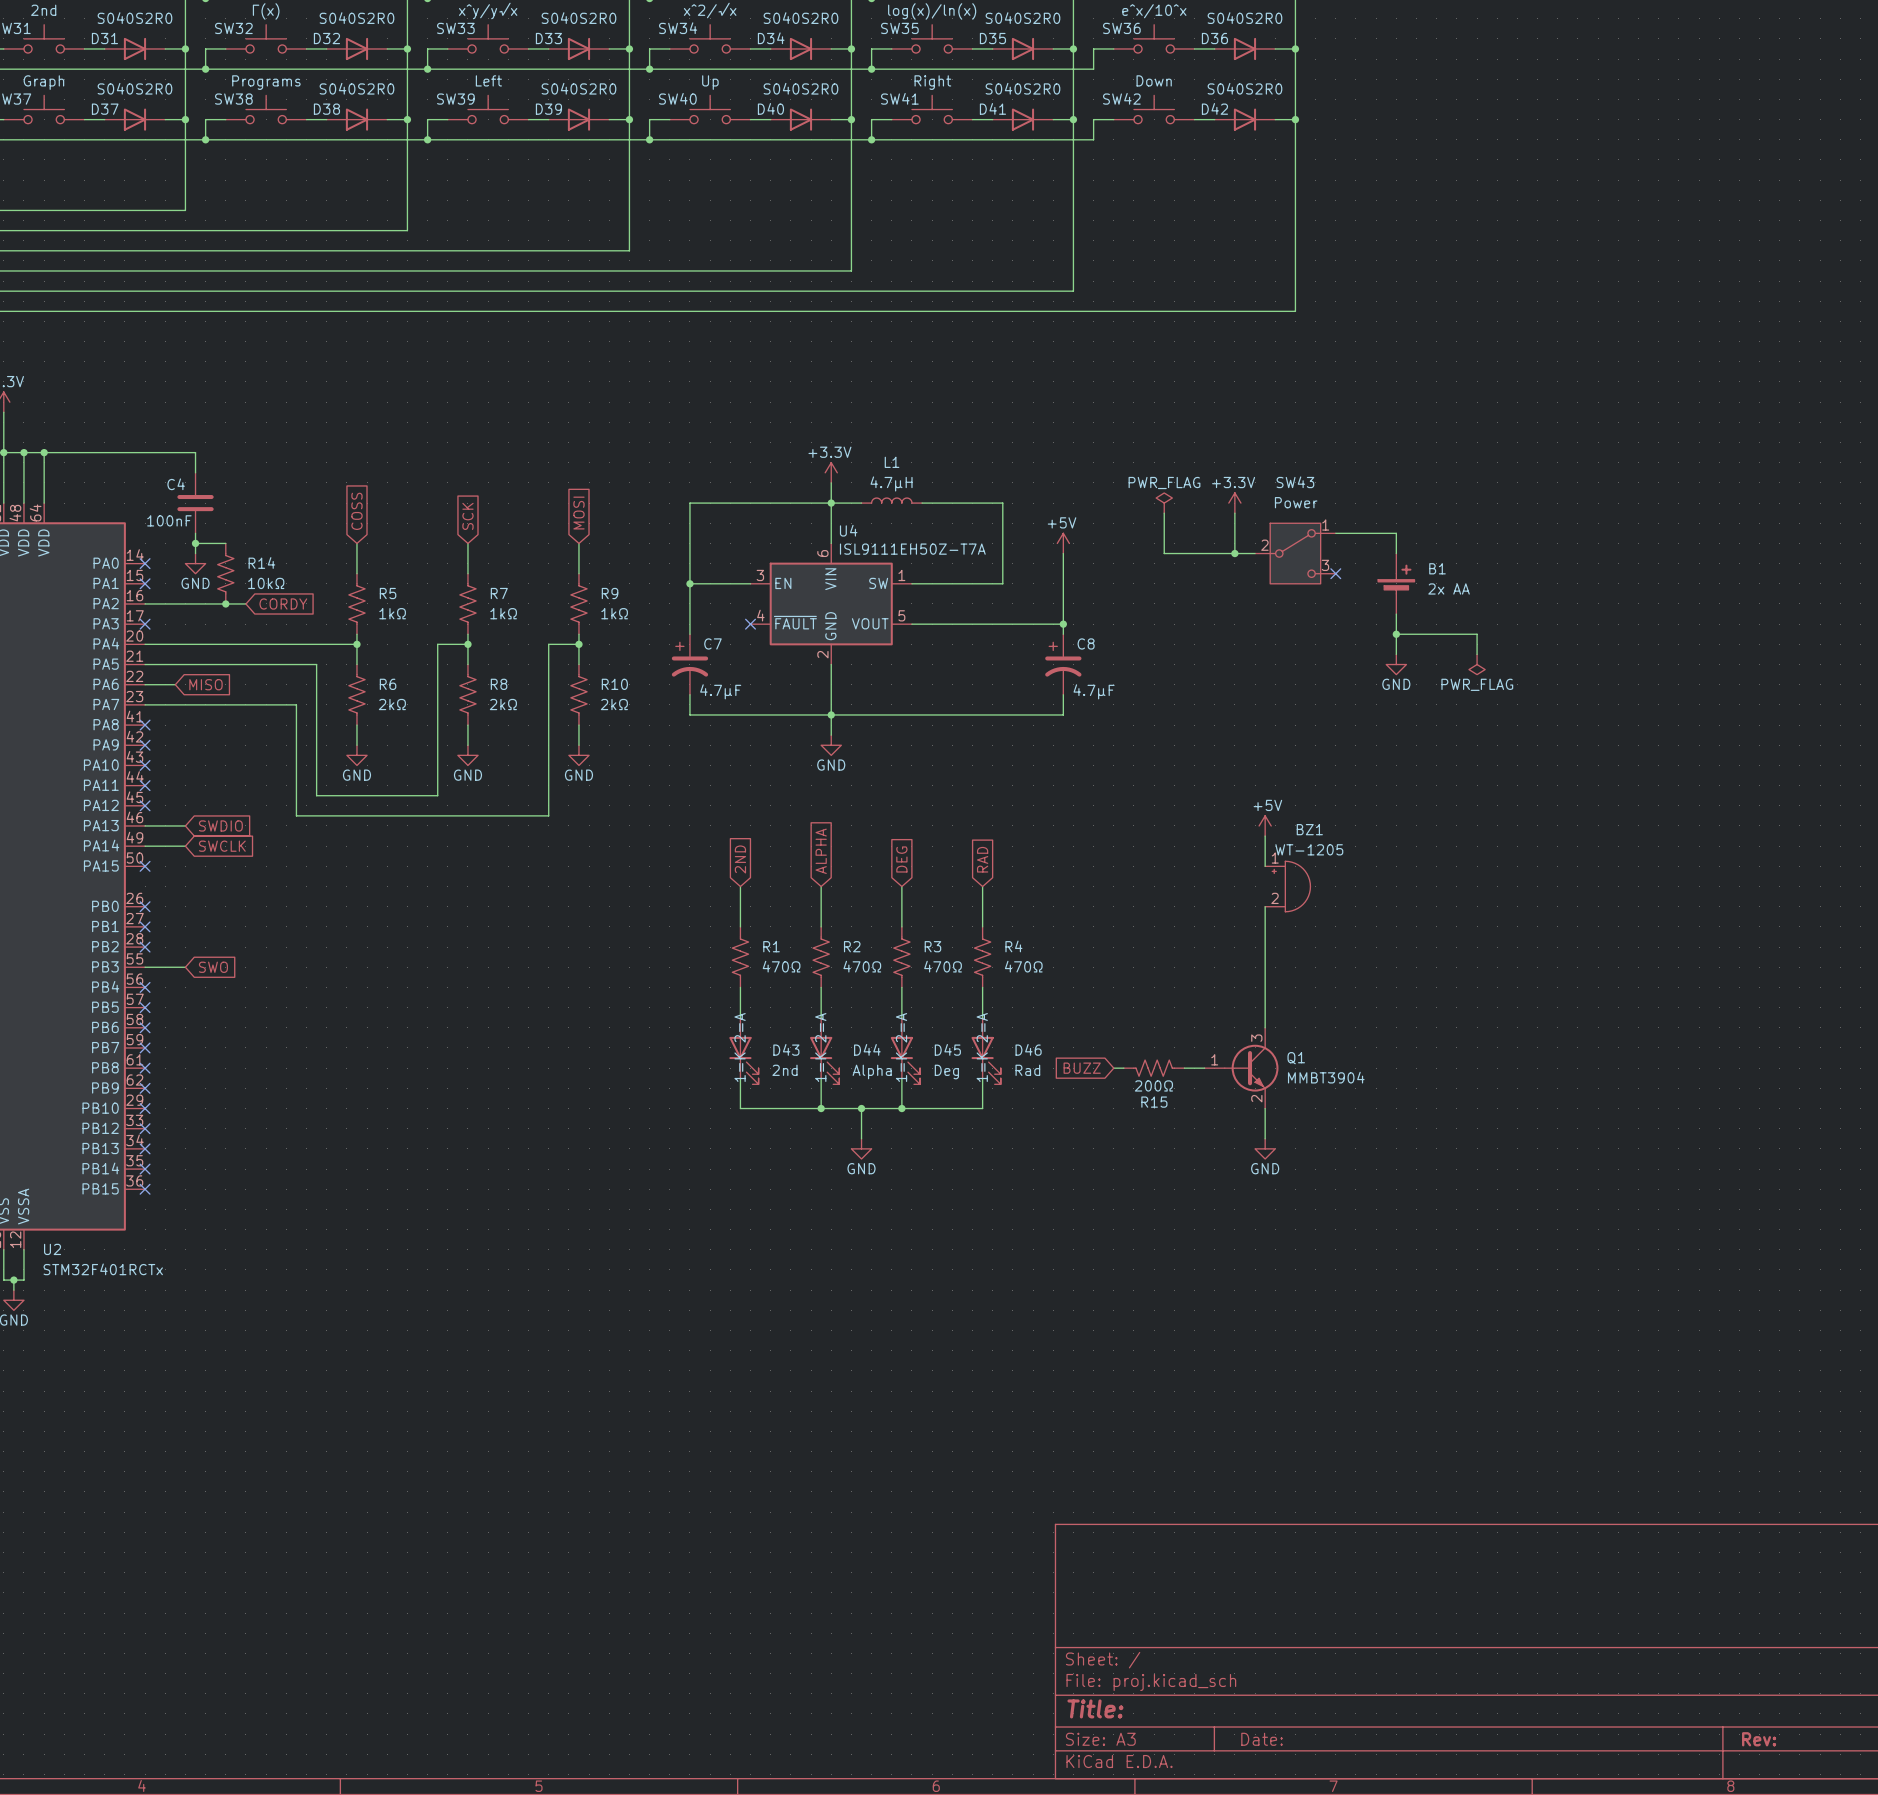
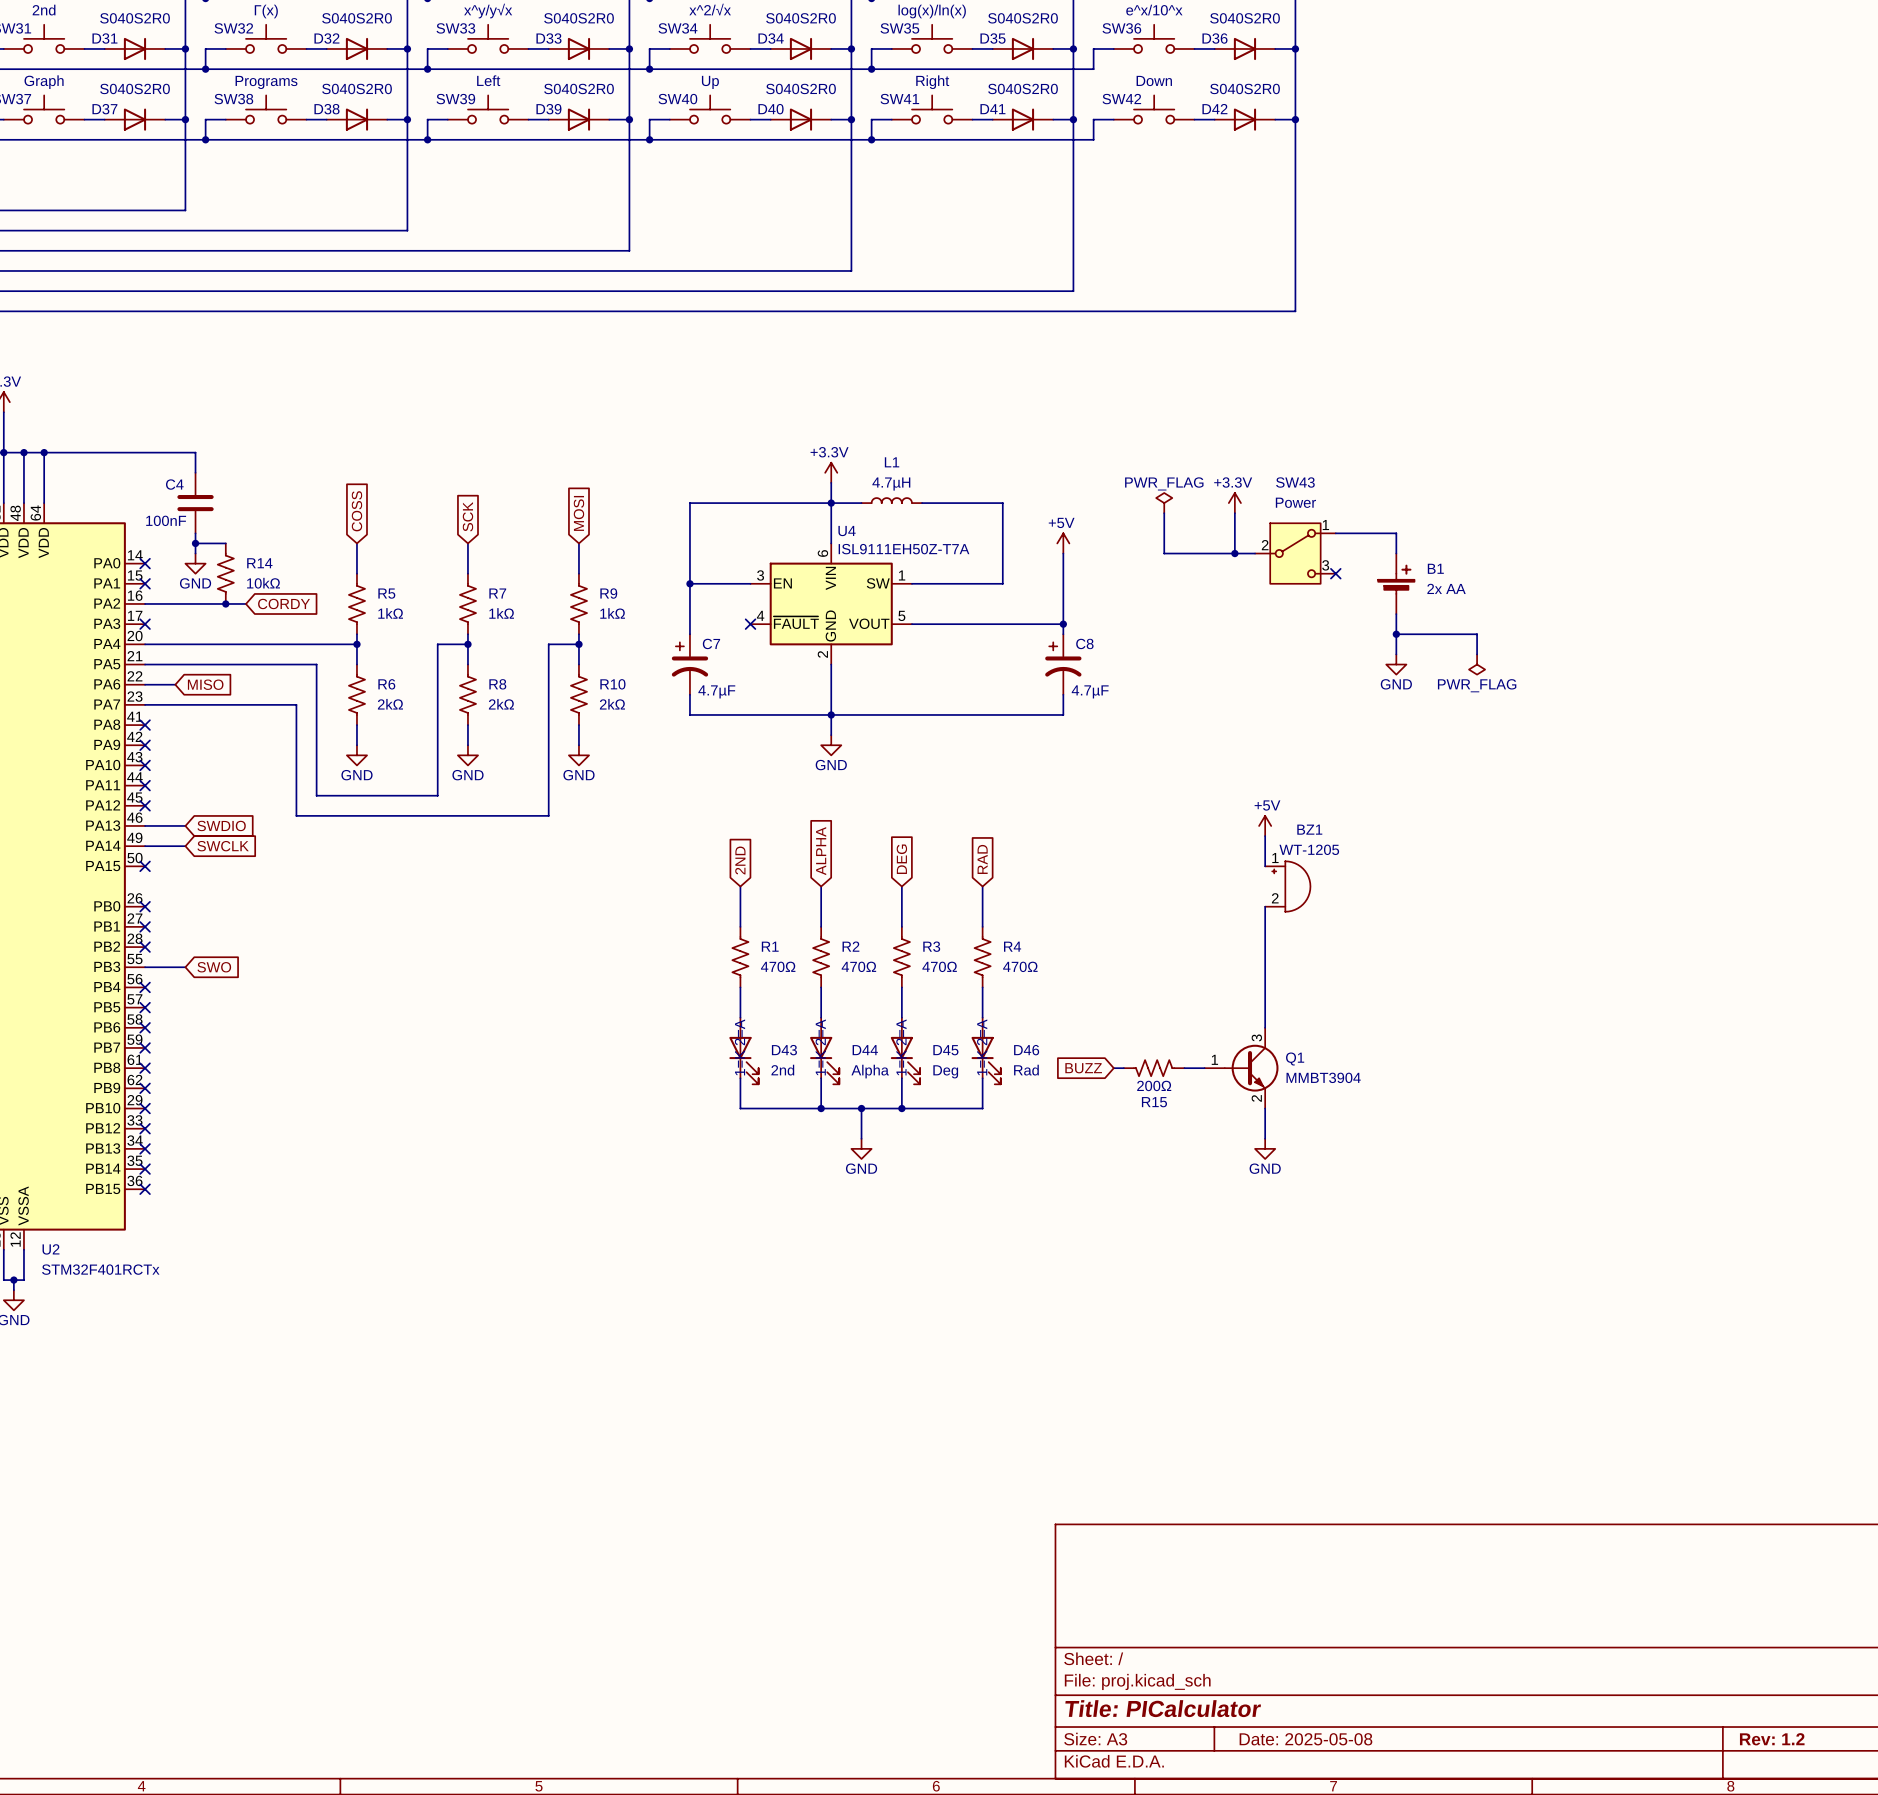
title block: Title: (1095, 1708) -> Title: PICalculator (1163, 1708)
title block: Date: (1262, 1739) -> Date: 2025-05-08 (1305, 1739)
title block: Rev: (1759, 1739) -> Rev: 1.2 (1772, 1739)

